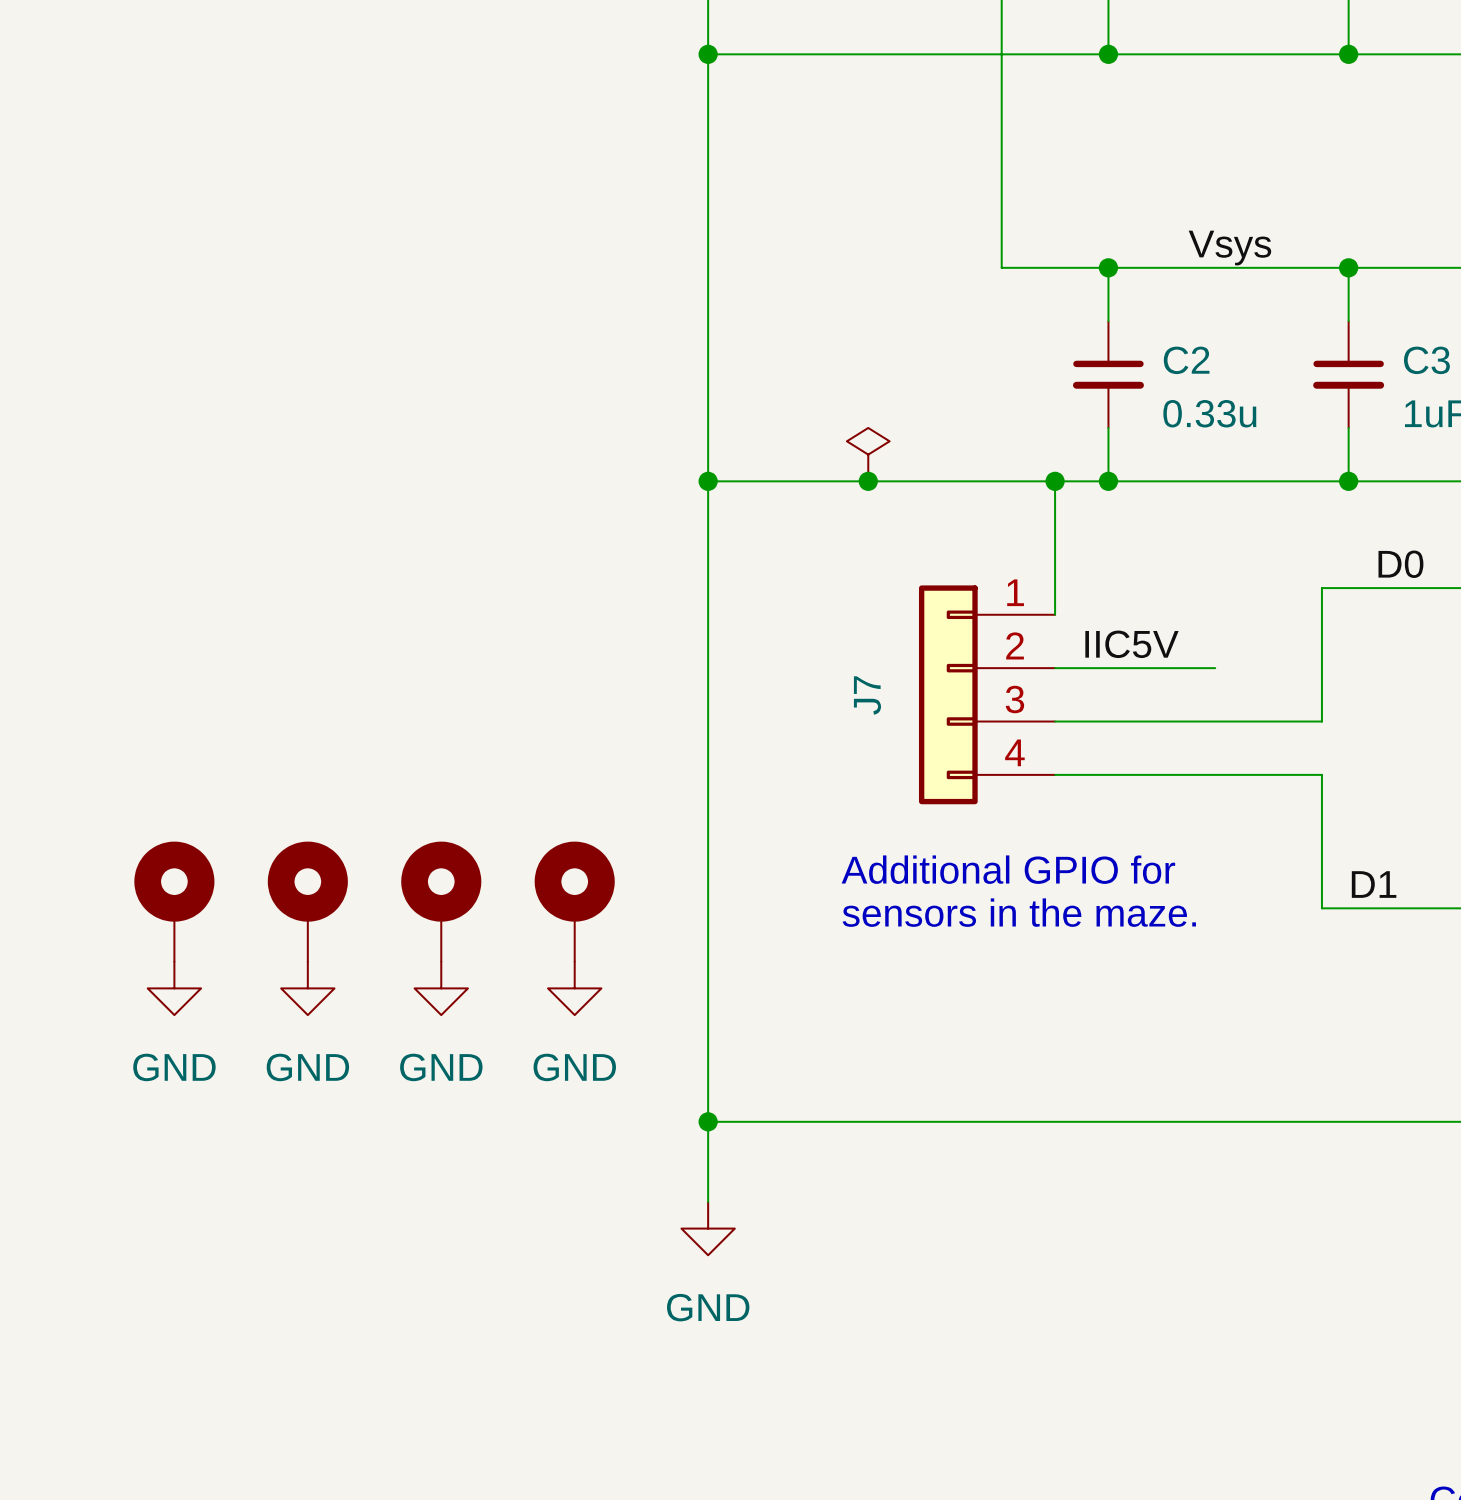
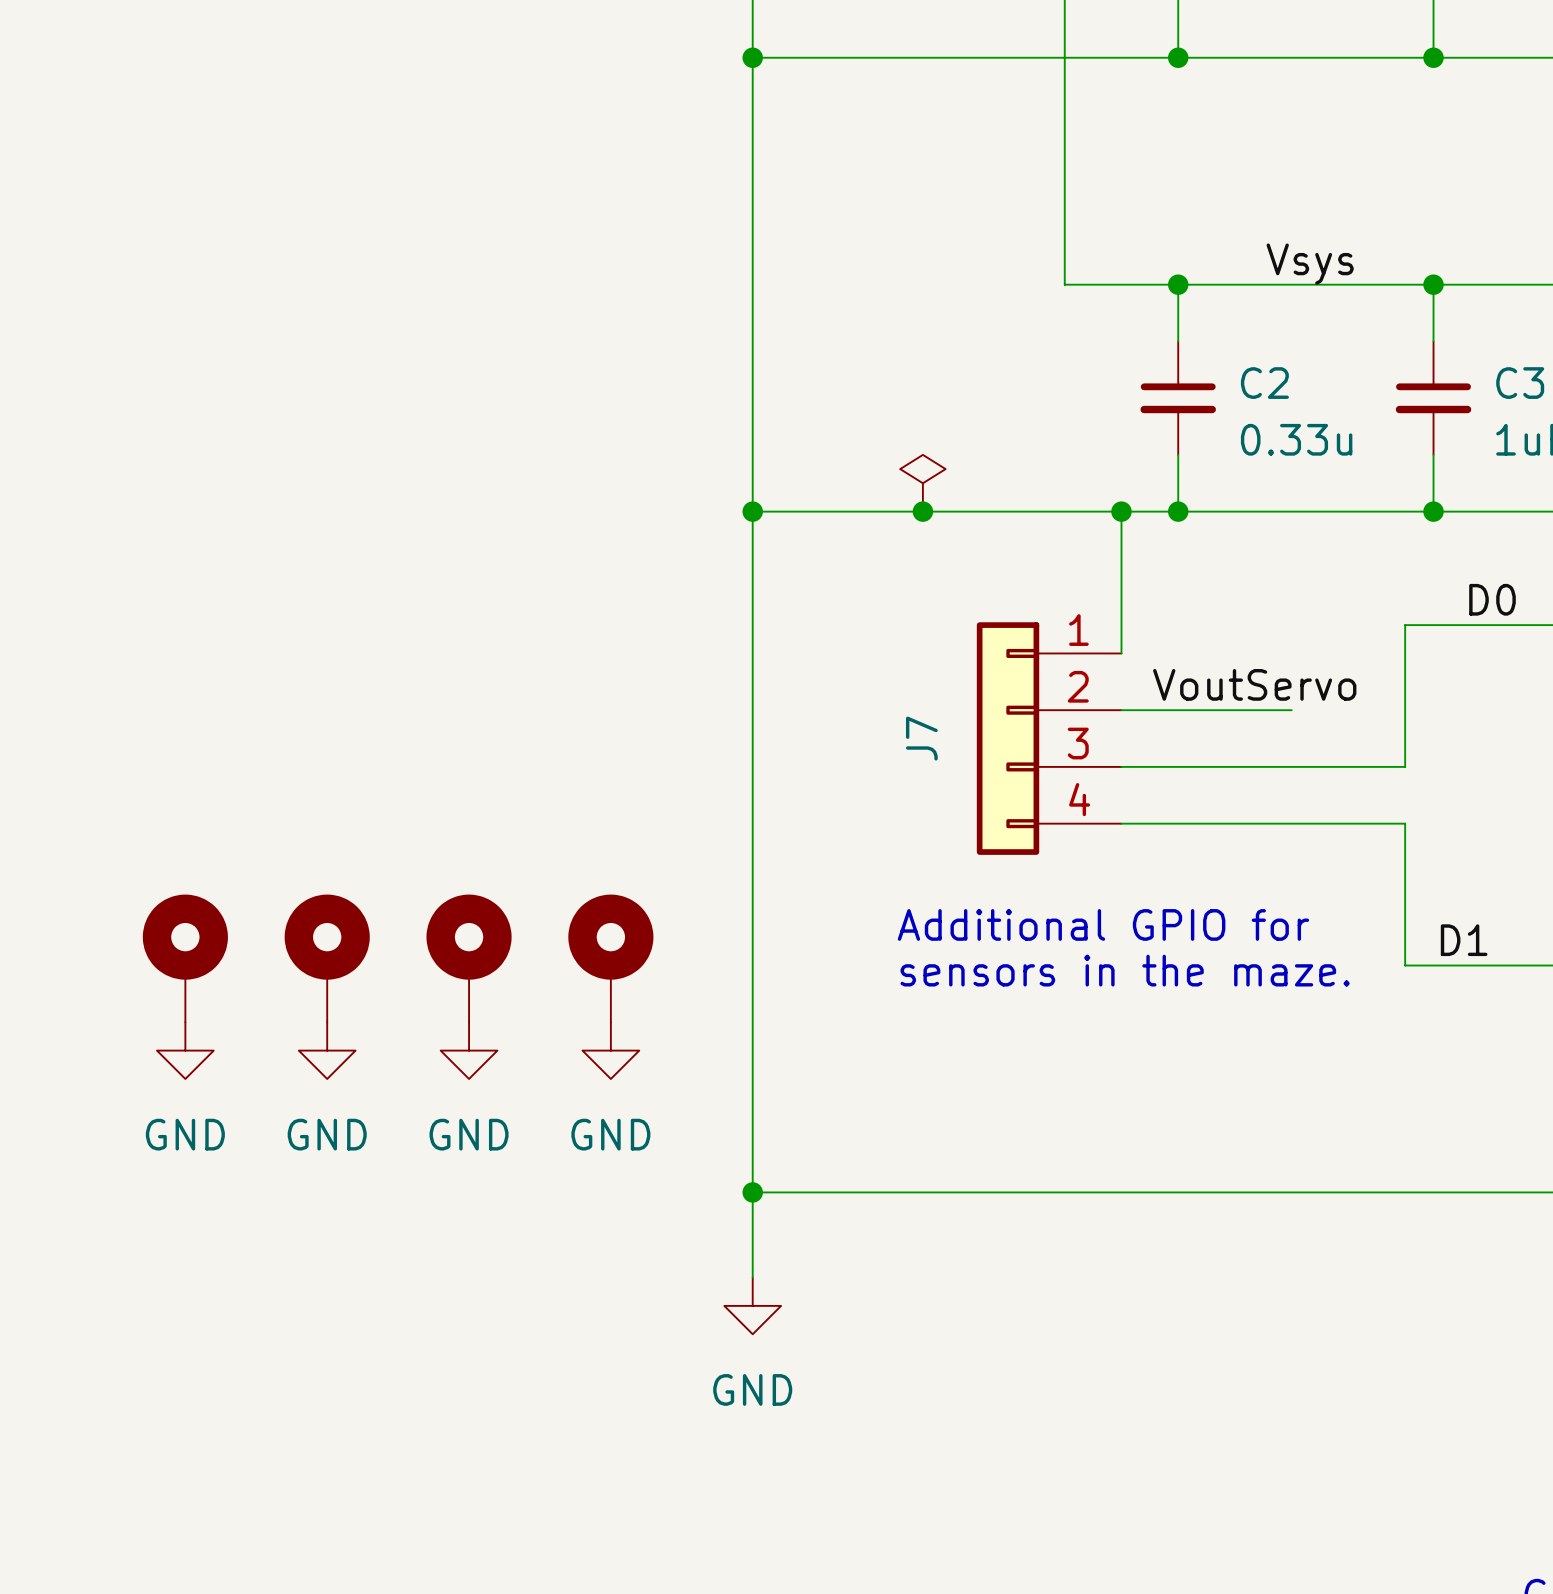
label: IIC5V (1131, 644) -> VoutServo (1254, 684)

